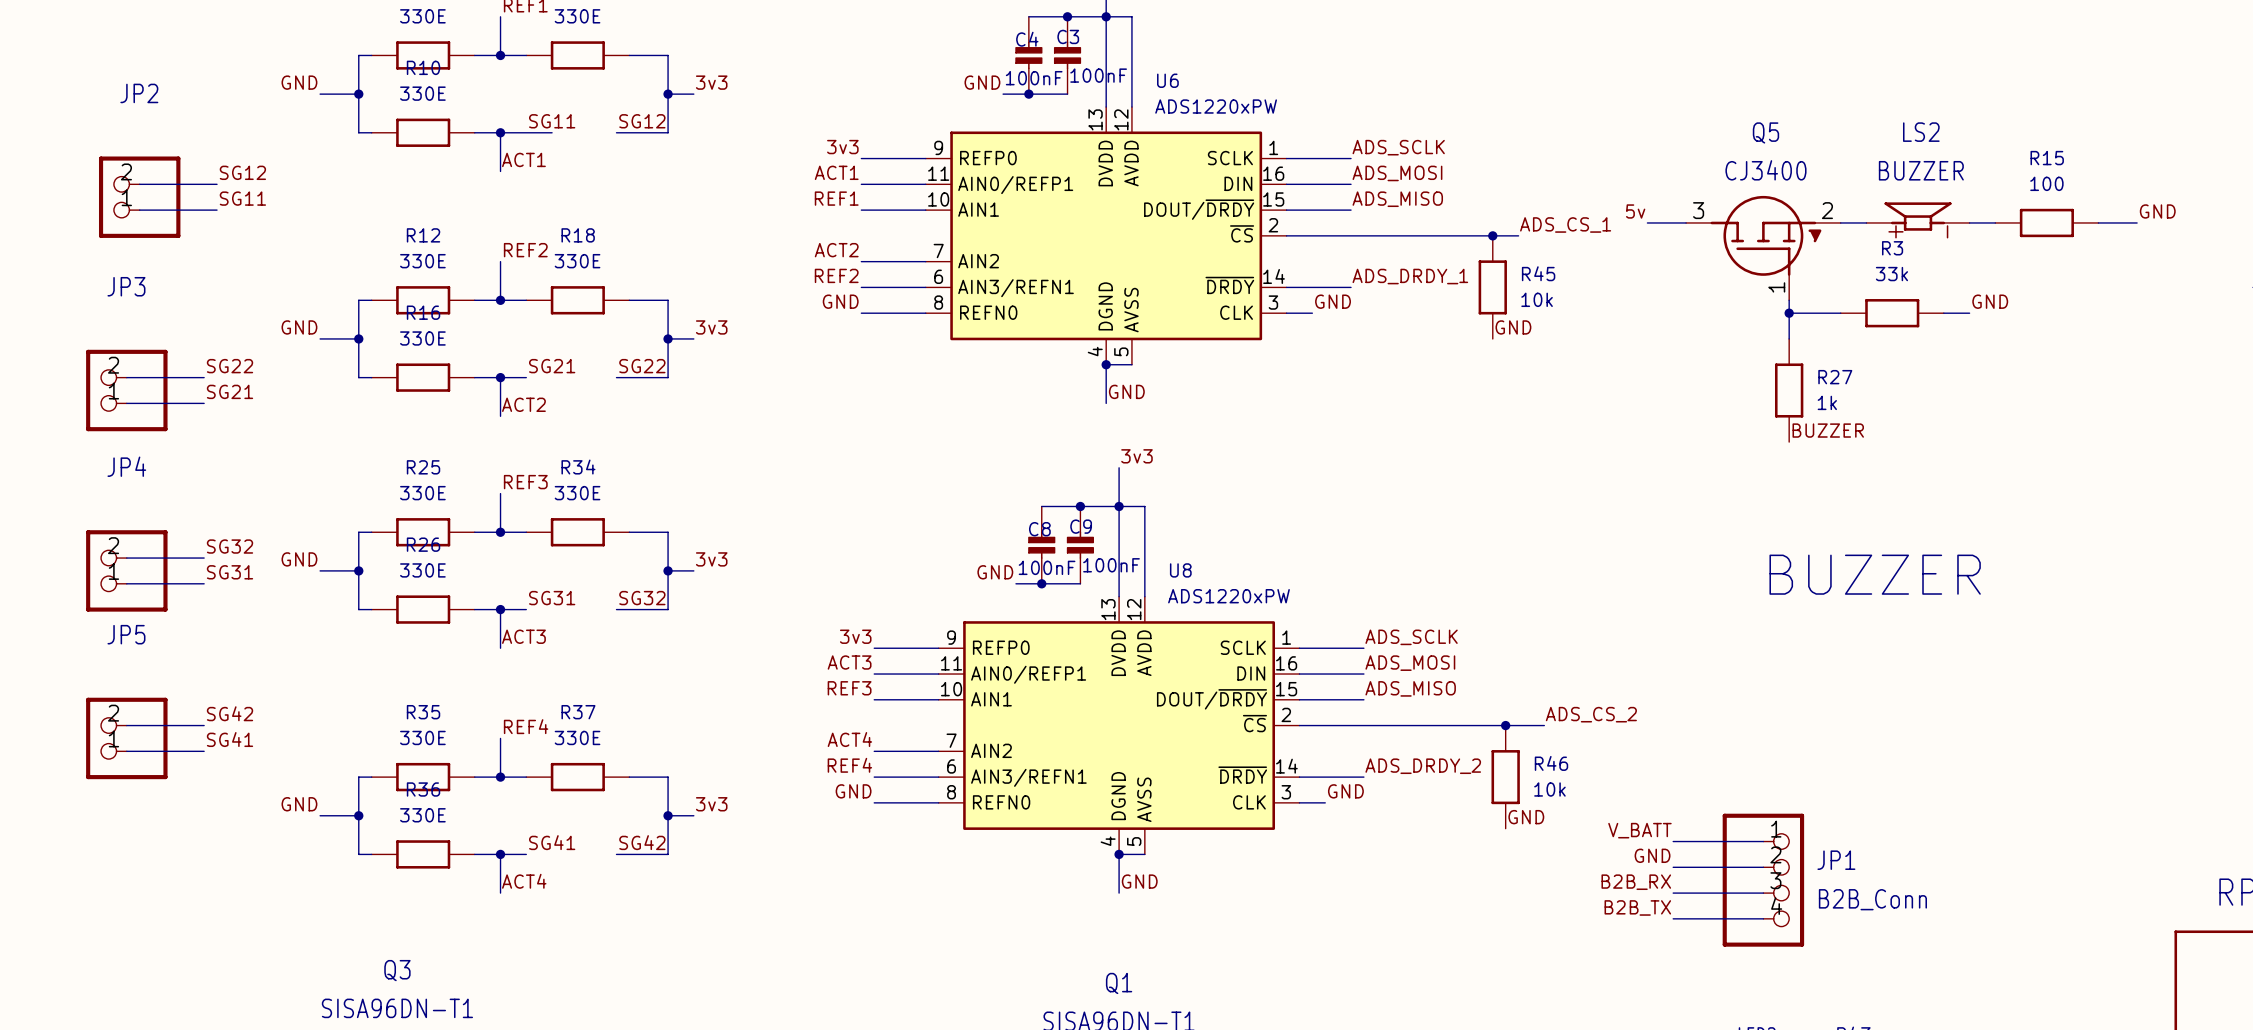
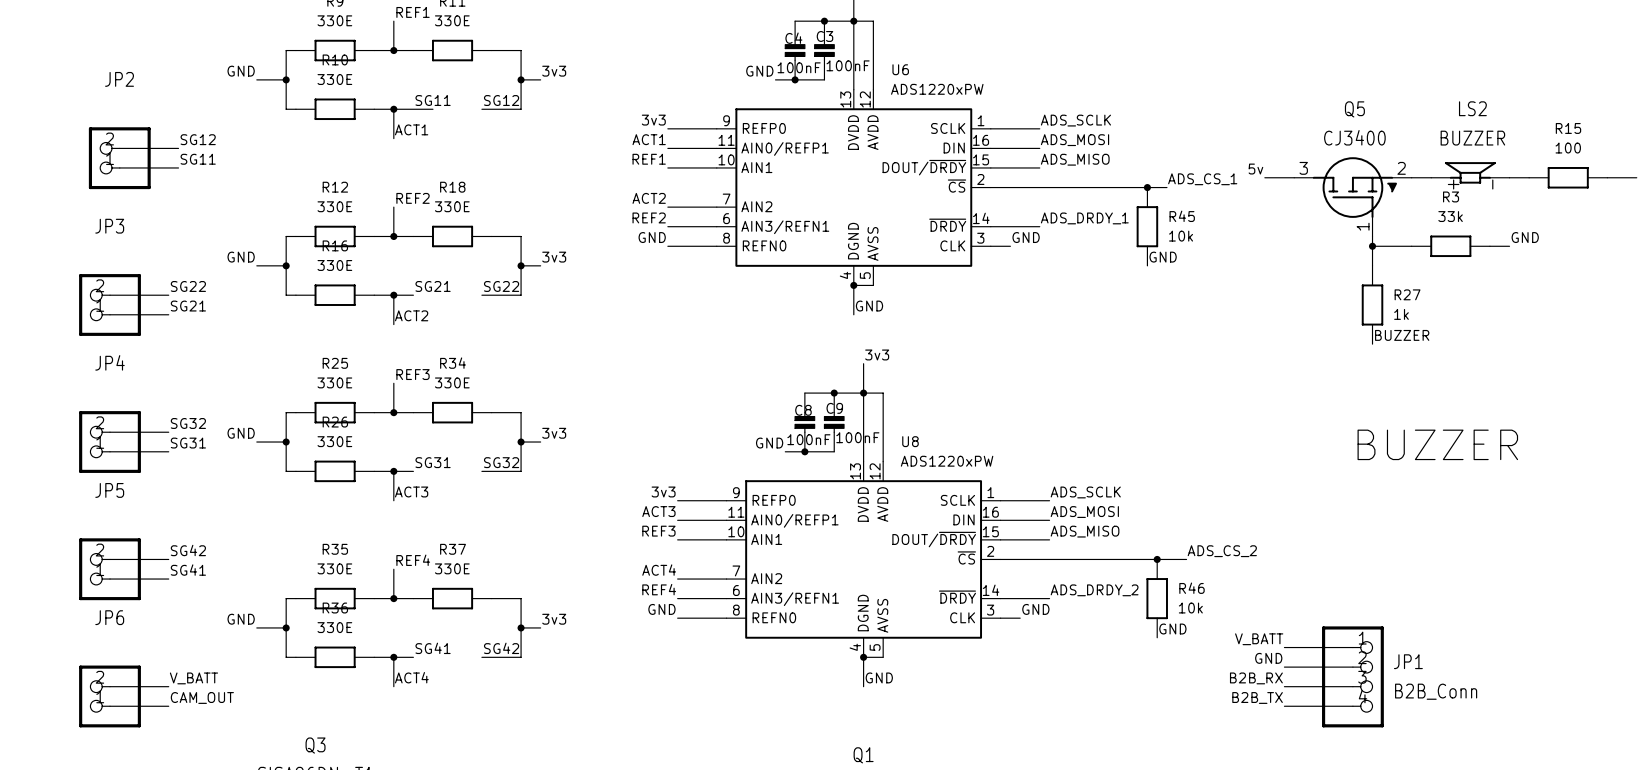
label: none -> V_BATT (193, 678)
wire: none -> (110, 686) (168, 686)
JP6: none -> (110, 696)
label: none -> CAM_OUT (202, 697)
wire: none -> (110, 706) (168, 706)

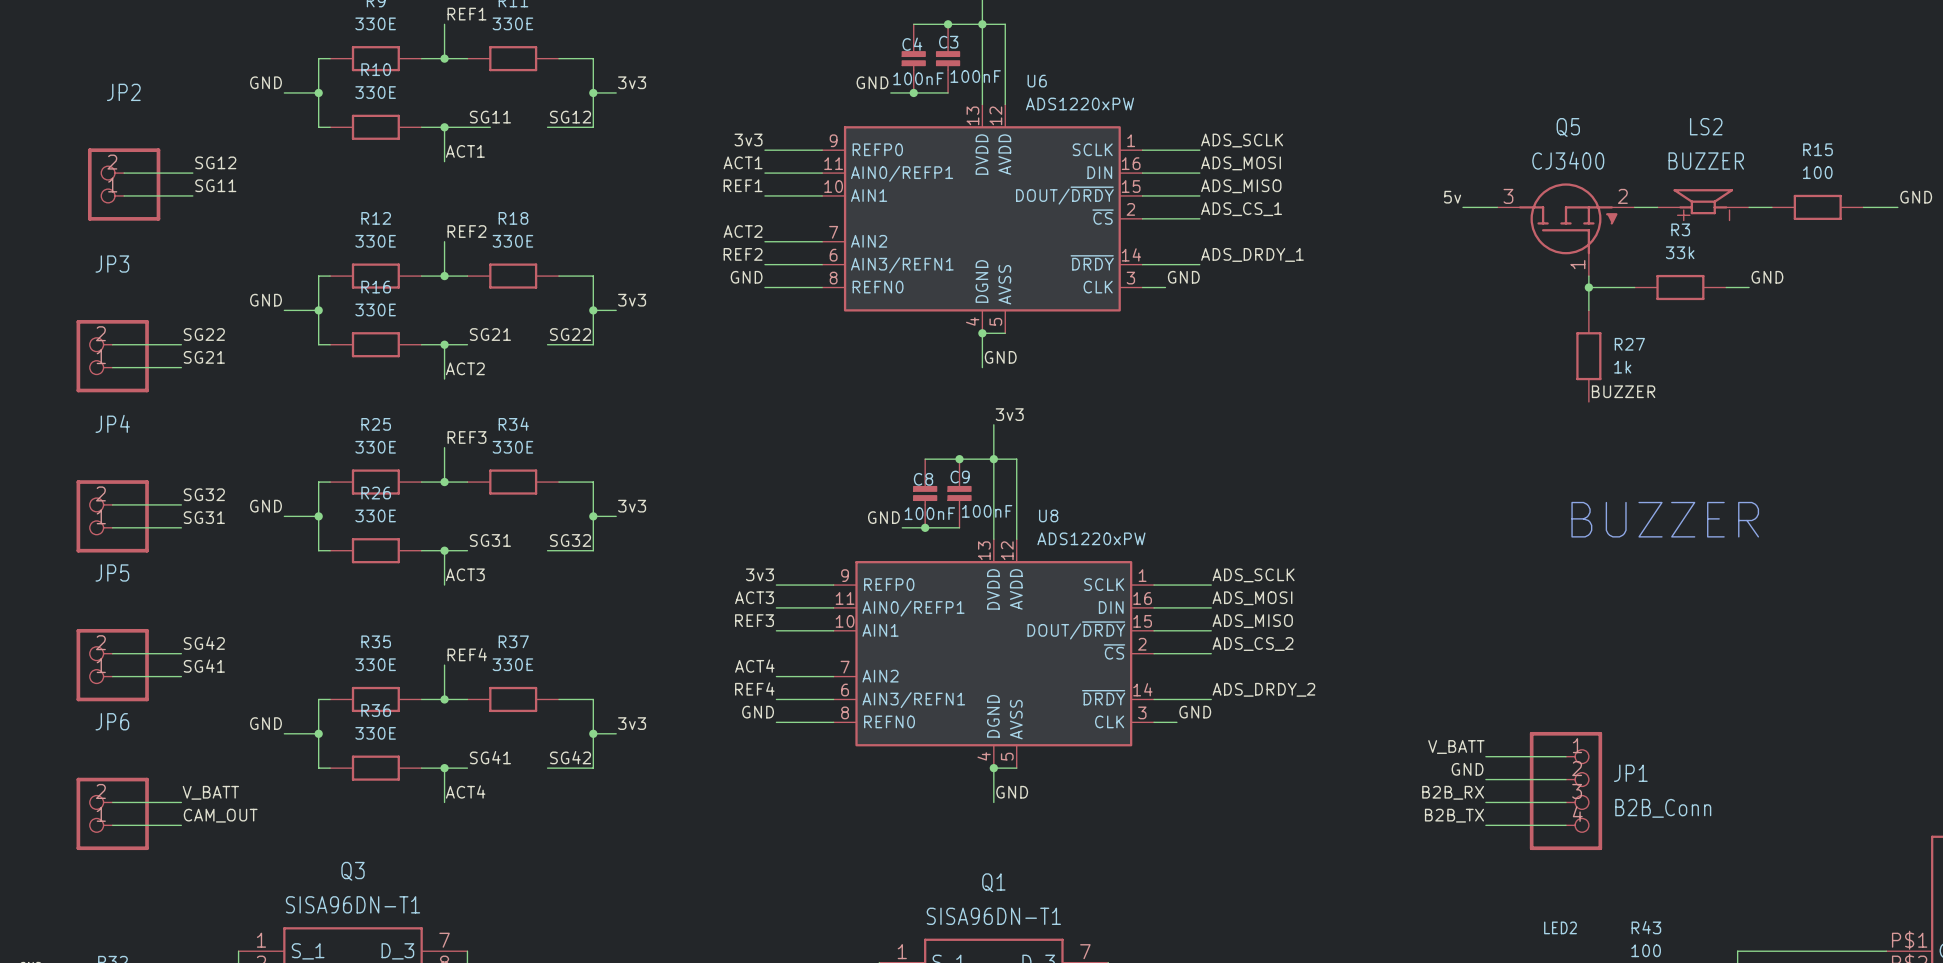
label position: ADS_CS_1 (1202, 179) -> ADS_CS_1 (1241, 209)
wire: (1039, 187) (1166, 187) -> none
junction: (1147, 187) -> none
R45: 10k (1147, 226) -> none
label: GND (1163, 257) -> none
label position: ADS_CS_2 (1222, 551) -> ADS_CS_2 (1253, 644)
wire: (1049, 559) (1186, 559) -> none
junction: (1157, 559) -> none
R46: 10k (1157, 598) -> none
label: GND (1172, 629) -> none

